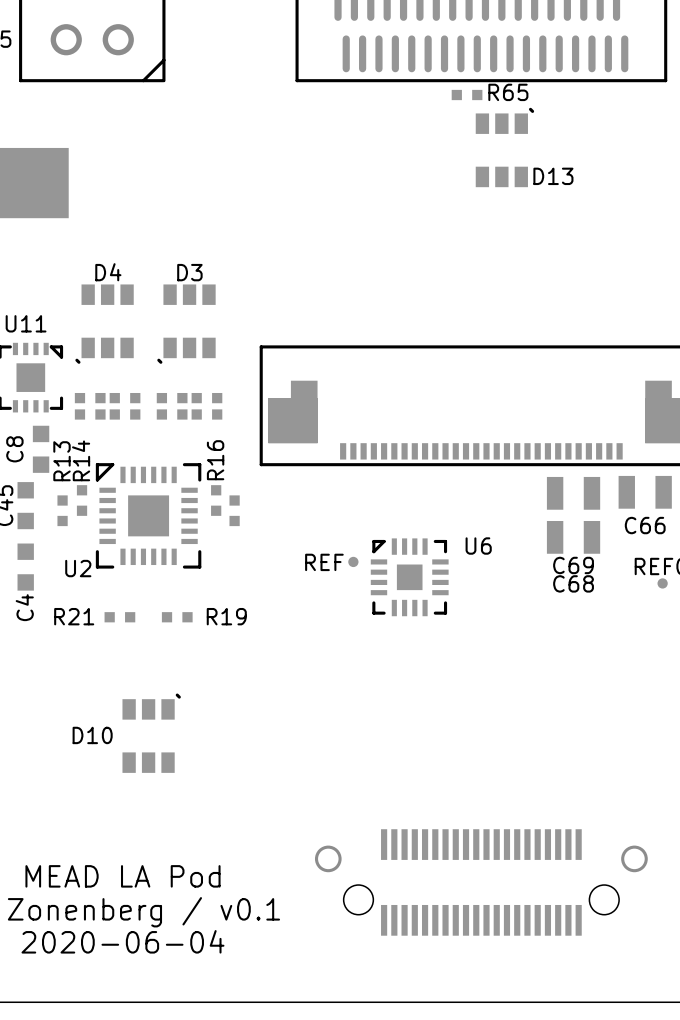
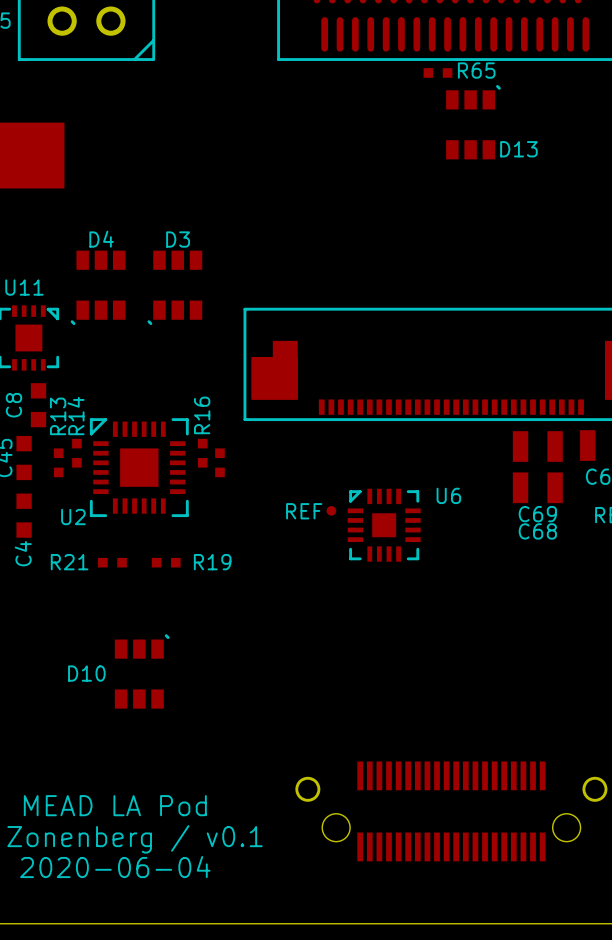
part: (90, 398) -> none
part: (125, 398) -> none
part: (172, 398) -> none
part: (206, 398) -> none
part: (90, 414) -> none
part: (125, 414) -> none
part: (172, 414) -> none
part: (206, 414) -> none

